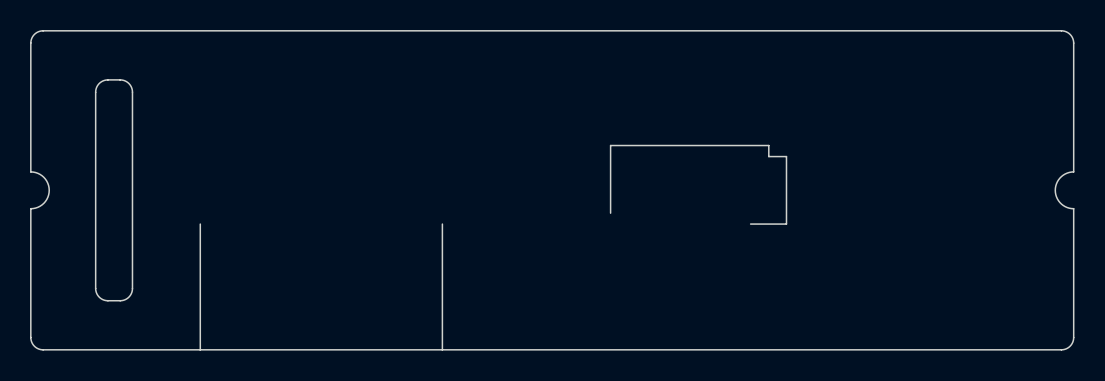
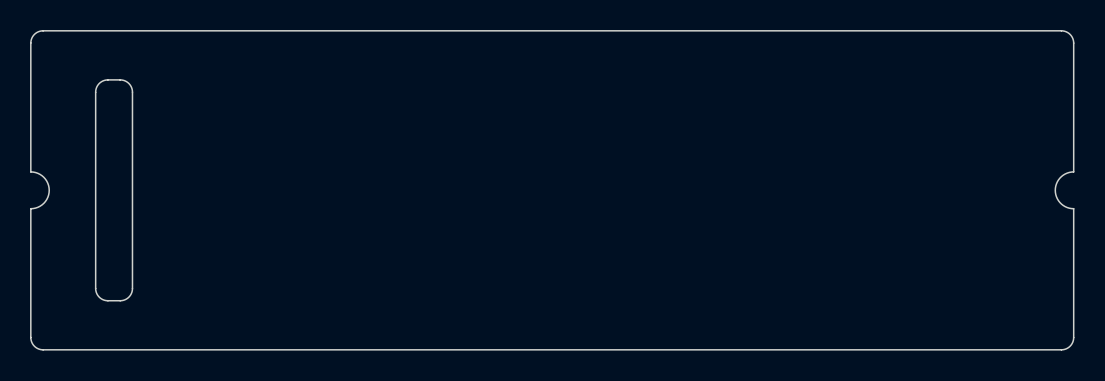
board edge: (610, 213) (610, 145) (768, 145) (768, 156) (786, 156) (786, 224) (750, 224) -> none
board edge: (200, 224) (200, 349) -> none
board edge: (442, 224) (442, 349) -> none

